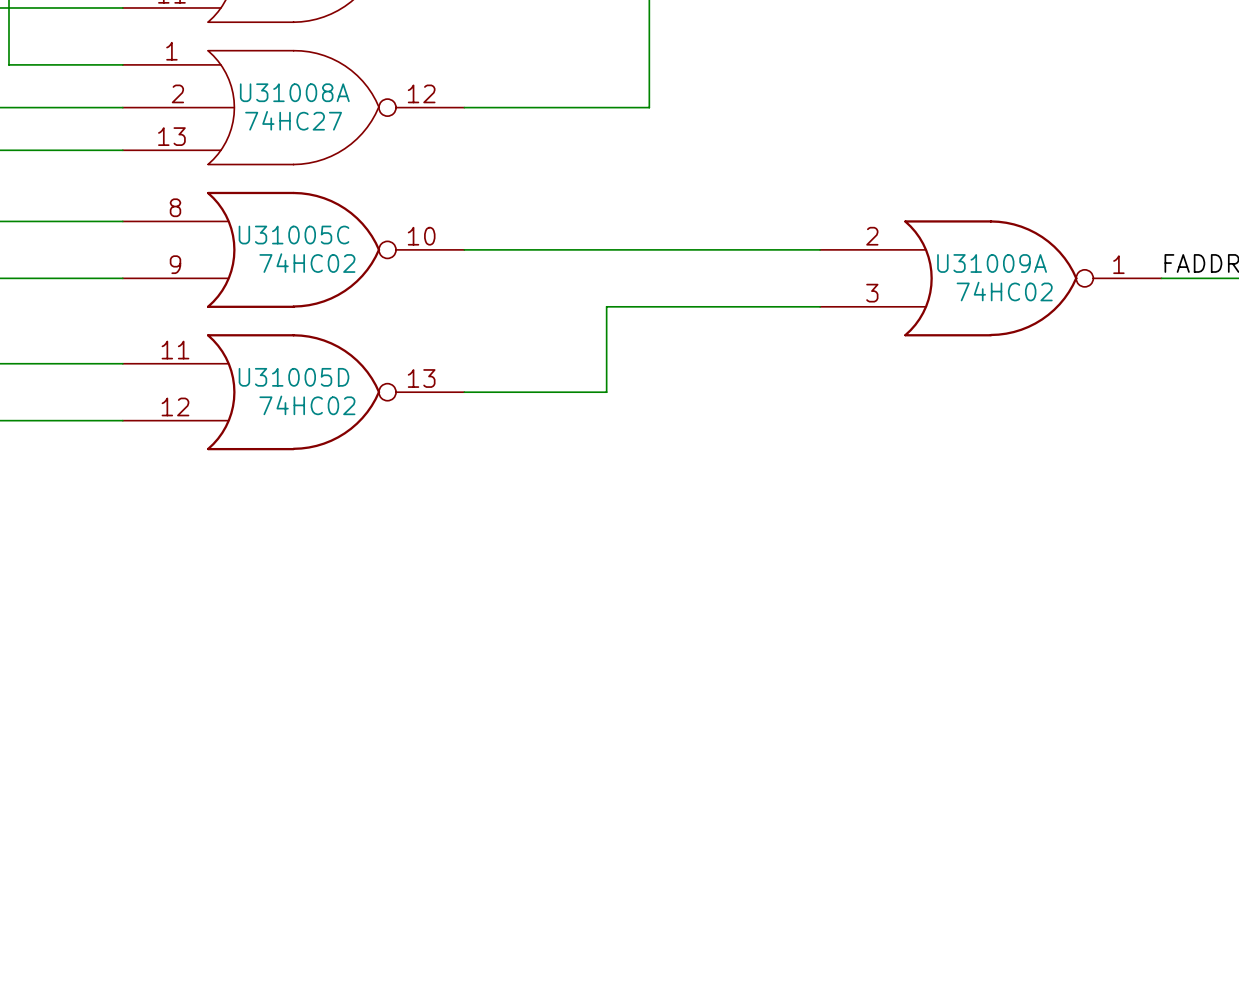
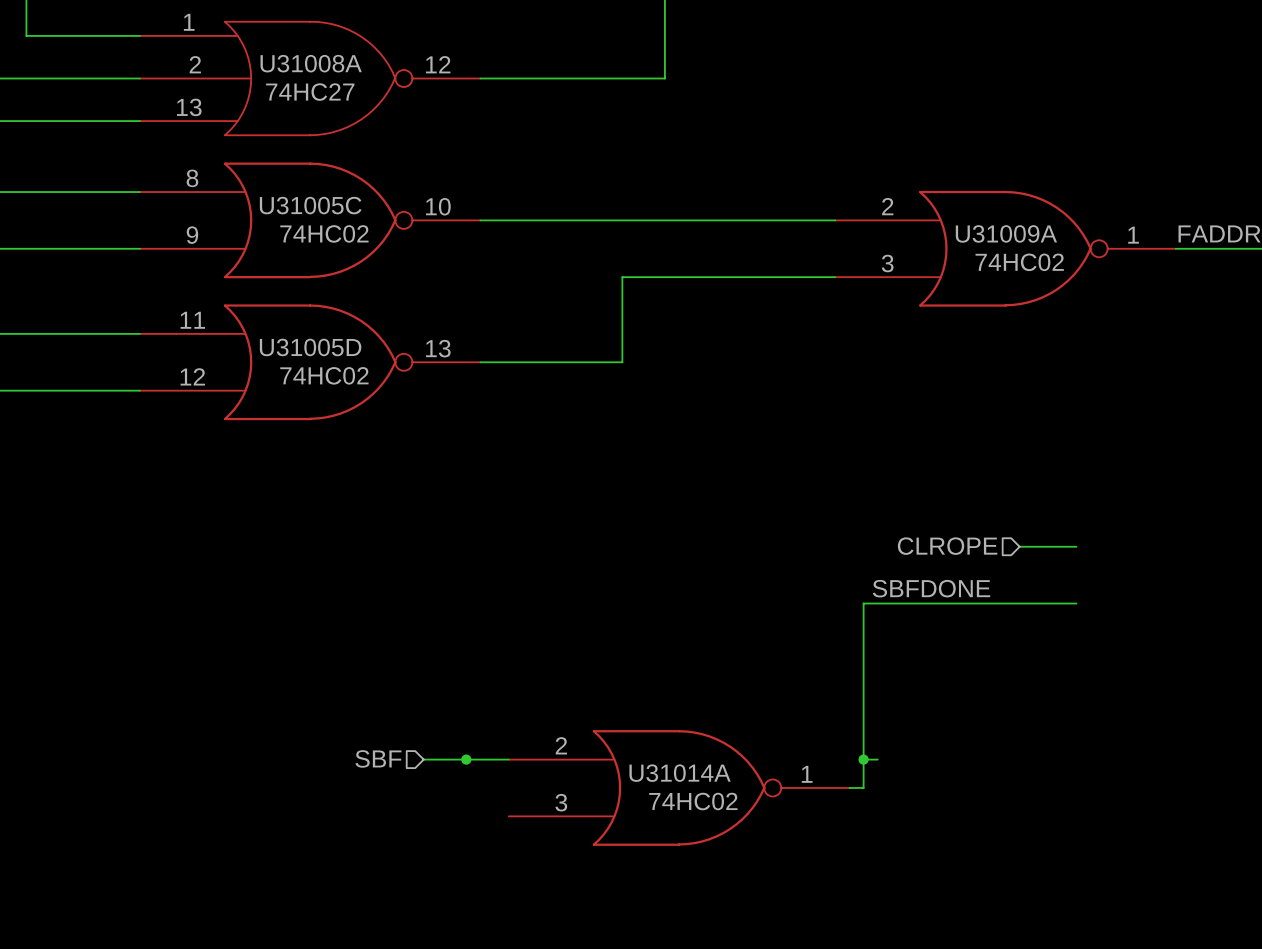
hierarchical label: none -> CLROPE (947, 546)
wire: none -> (1019, 546) (1076, 546)
label: none -> SBFDONE (931, 588)
wire: none -> (1076, 603) (863, 603) (863, 787) (849, 787)
hierarchical label: none -> SBF (378, 758)
wire: none -> (423, 759) (508, 759)
junction: none -> (466, 759)
wire: none -> (863, 759) (877, 759)
junction: none -> (863, 759)
U31014A: none -> 74HC02 (679, 787)

